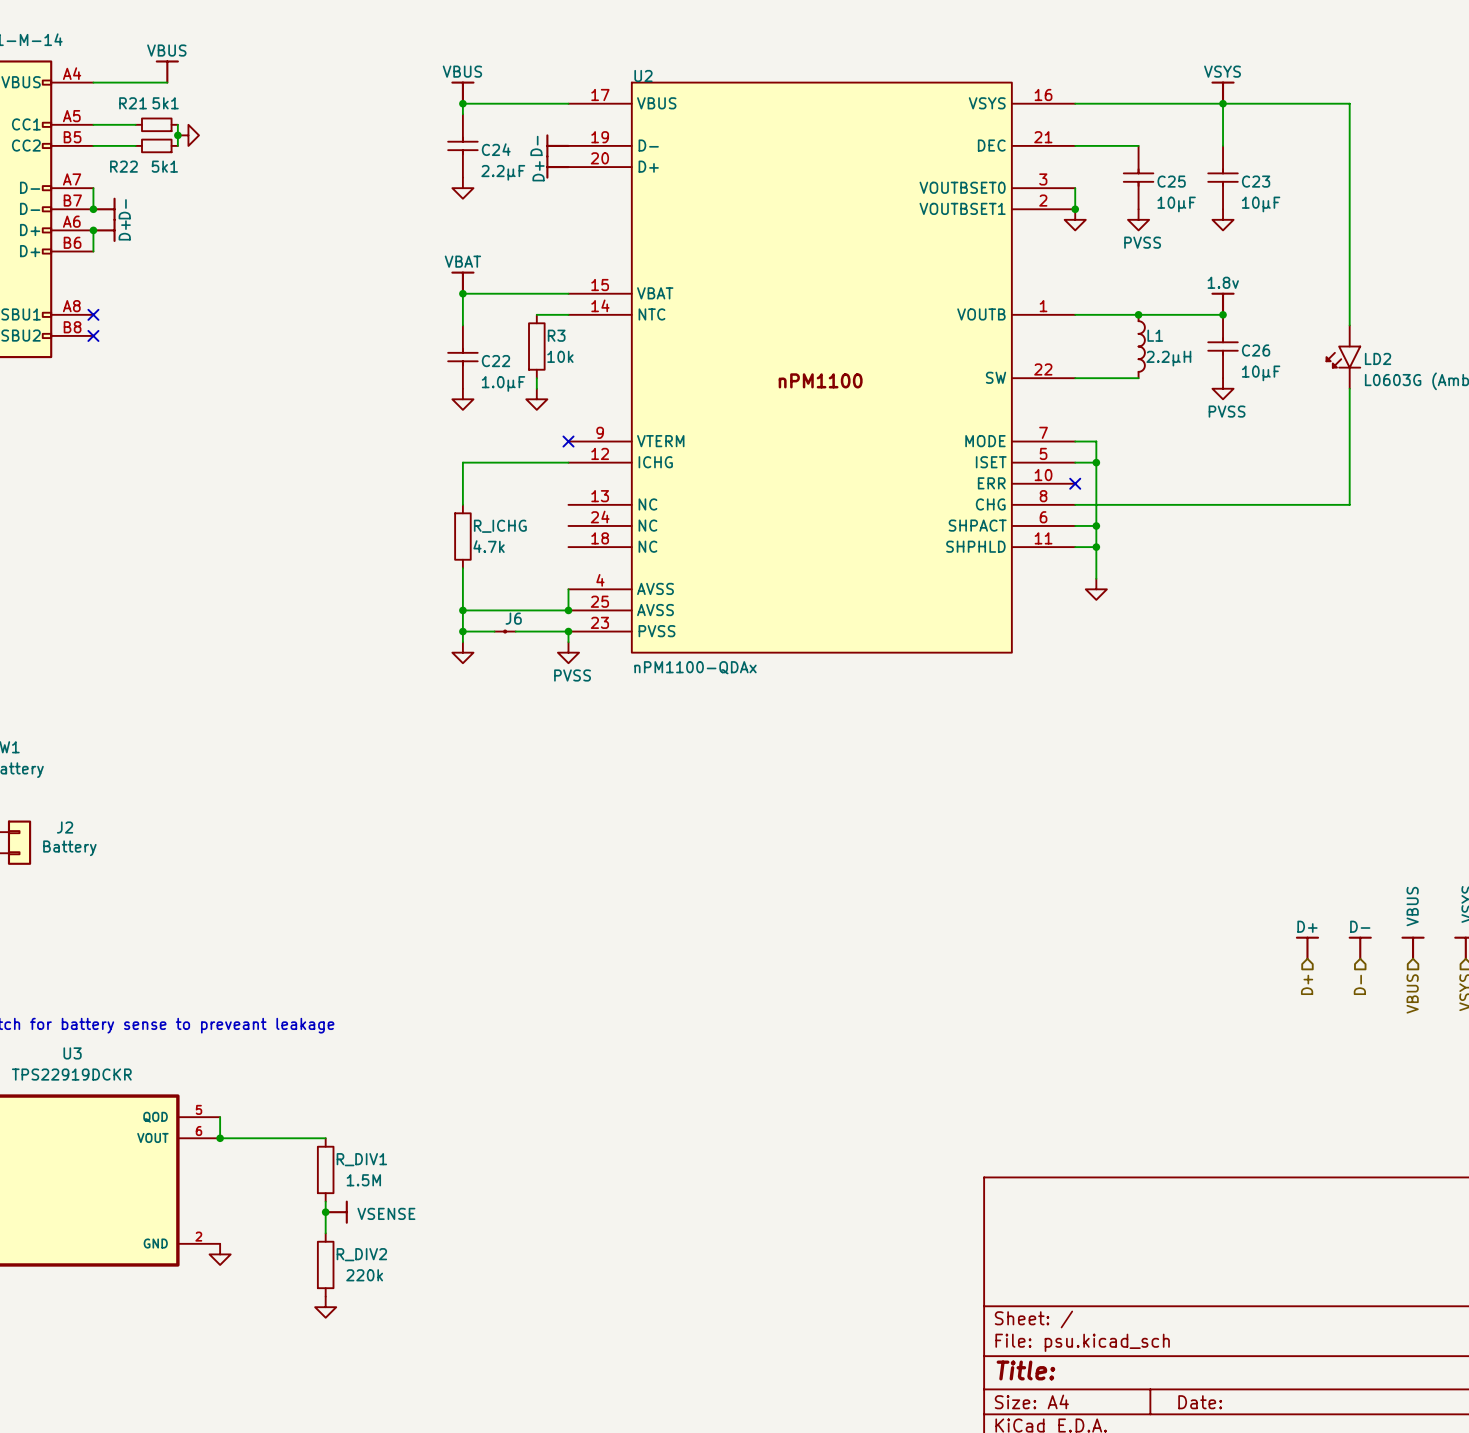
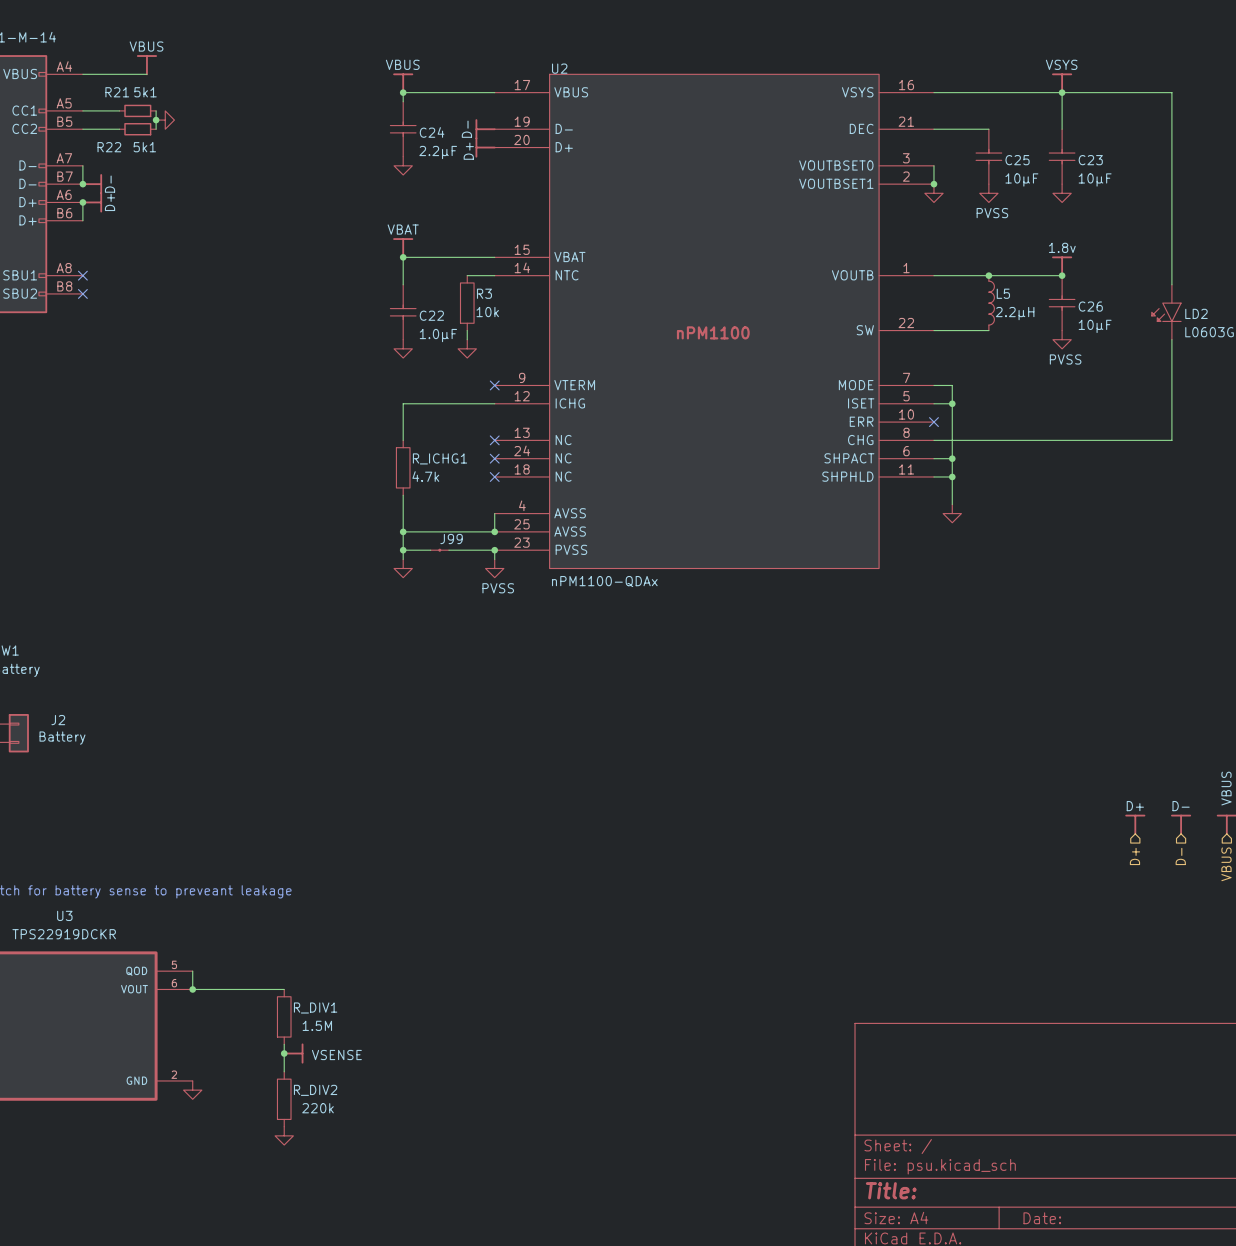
L1 name: L1 (1155, 335) -> L5 (1003, 293)
no-connect mark: none -> (494, 440)
no-connect mark: none -> (494, 458)
R_ICHG name: R_ICHG (500, 526) -> R_ICHG1 (440, 458)
no-connect mark: none -> (494, 476)
J6 name: J6 (513, 618) -> J99 (451, 539)

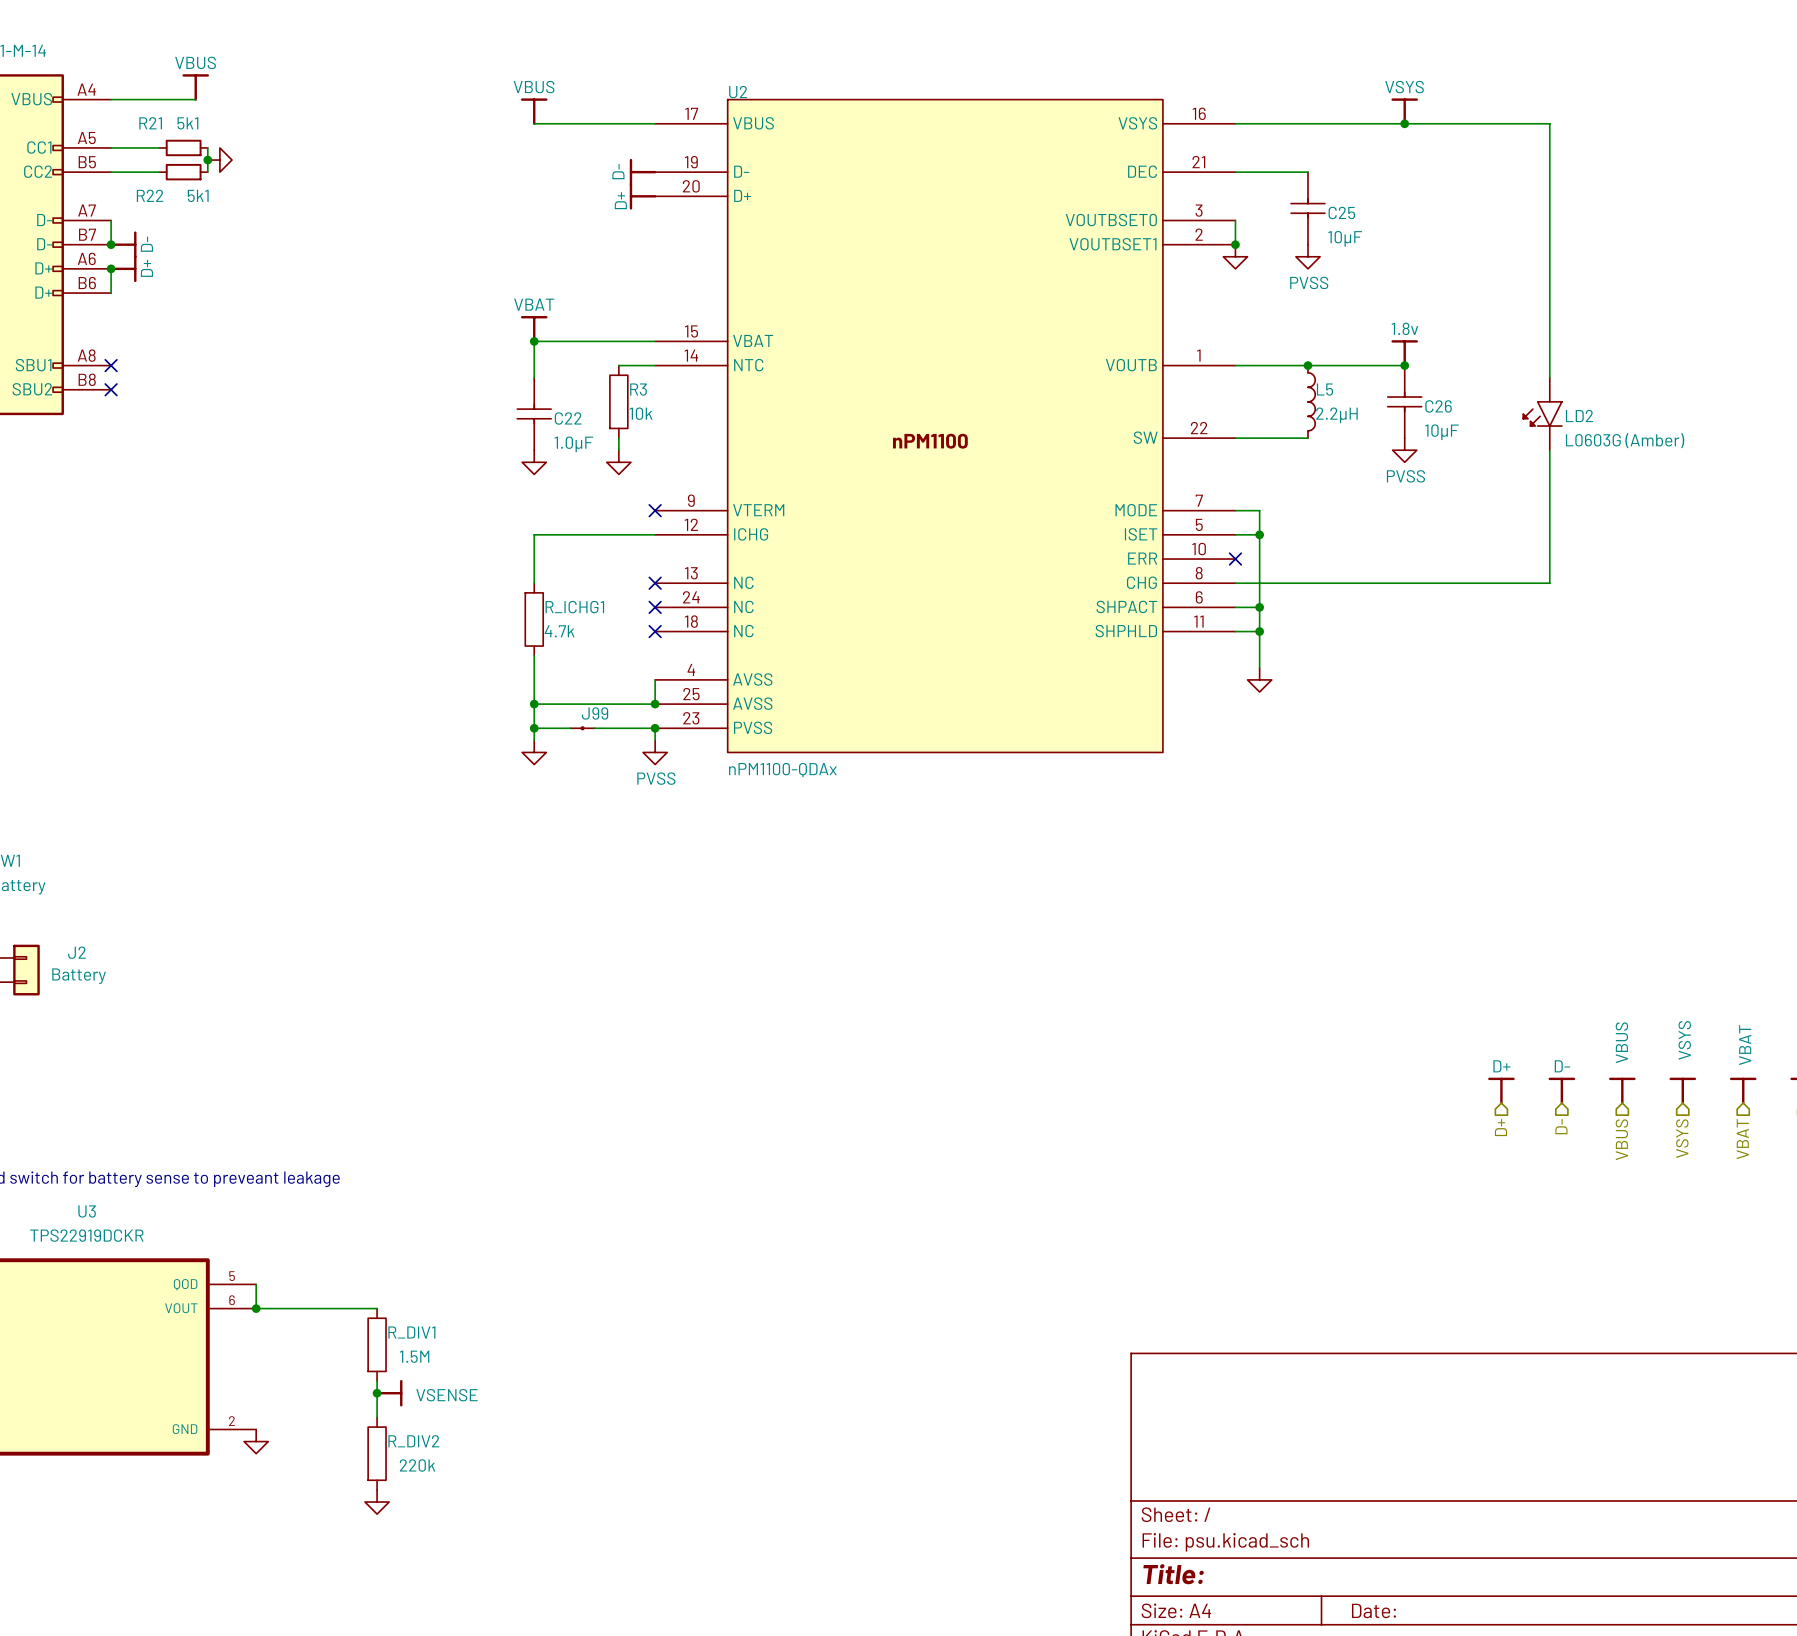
wire: (403, 92) (403, 101) -> none
junction: (403, 92) -> none
wire: (1062, 92) (1062, 129) -> none
C24: 2.2µF (403, 129) -> none
C23: 10µF (1062, 156) -> none
power symbol: (403, 165) -> none
power symbol: (1062, 193) -> none

